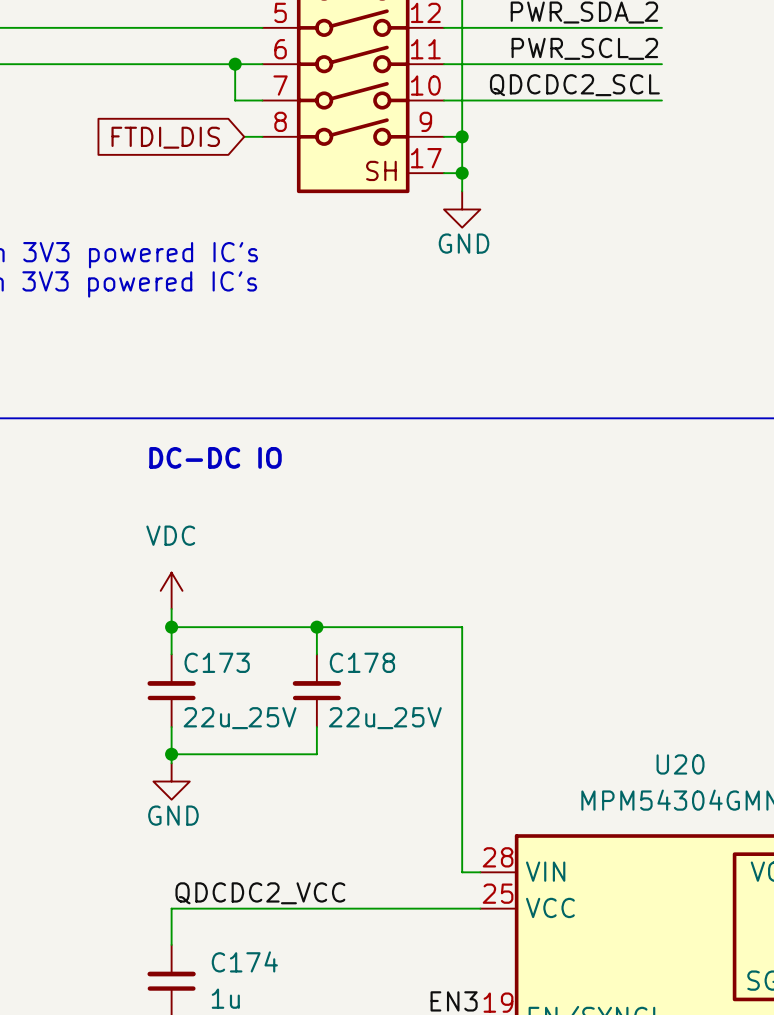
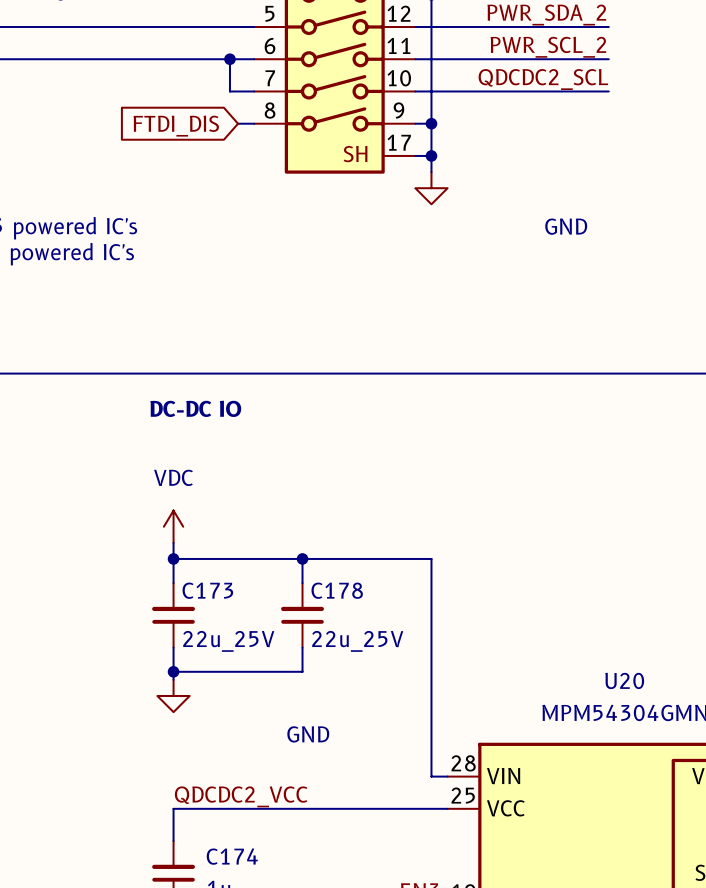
power symbol text position: GND (464, 243) -> GND (566, 226)
power symbol text position: GND (173, 815) -> GND (308, 734)

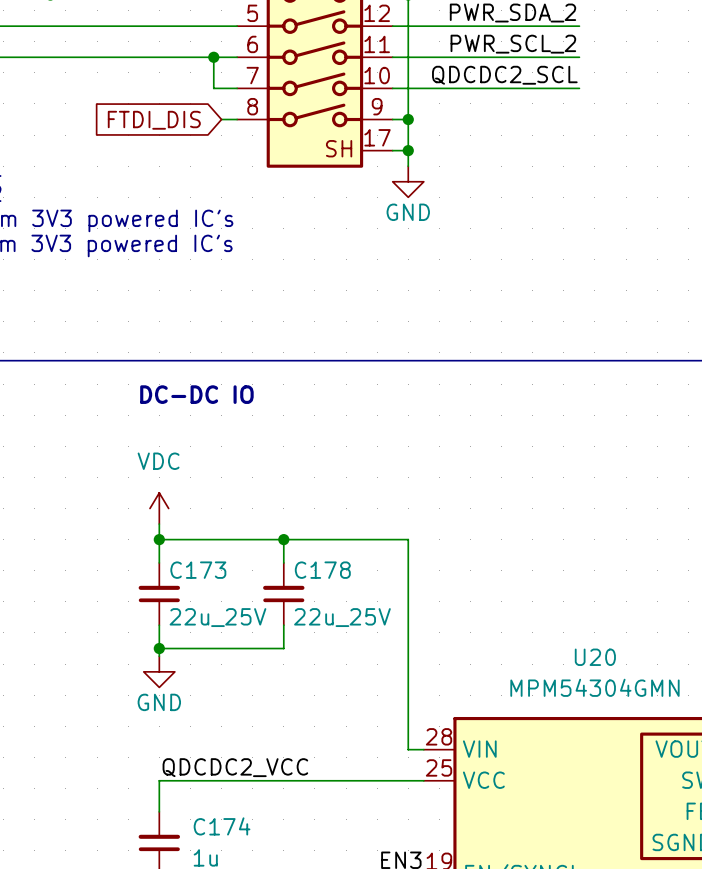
power symbol text position: GND (566, 226) -> GND (408, 212)
power symbol text position: GND (308, 734) -> GND (159, 702)

